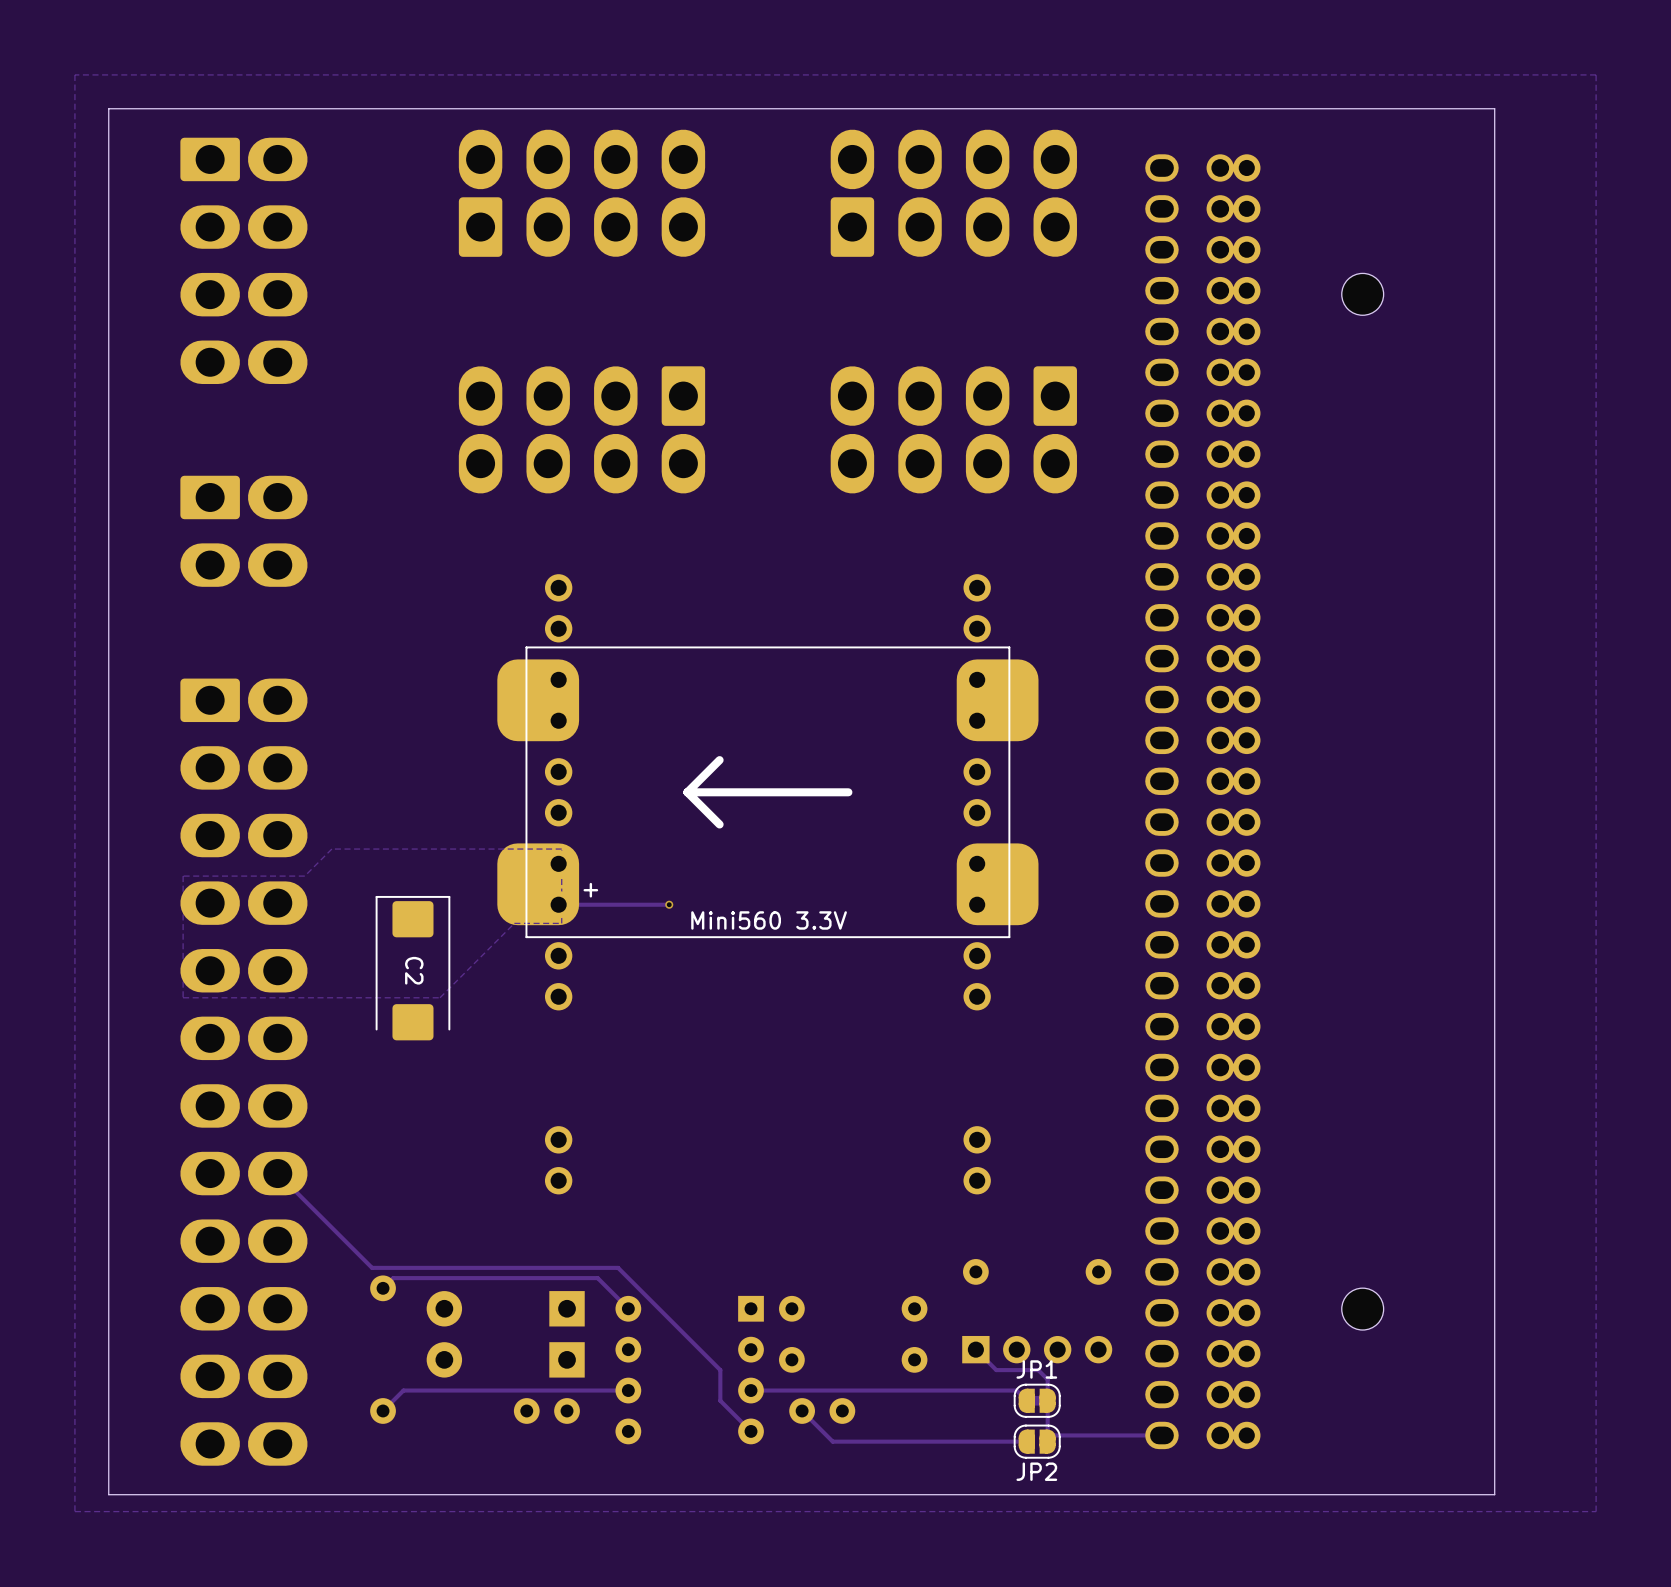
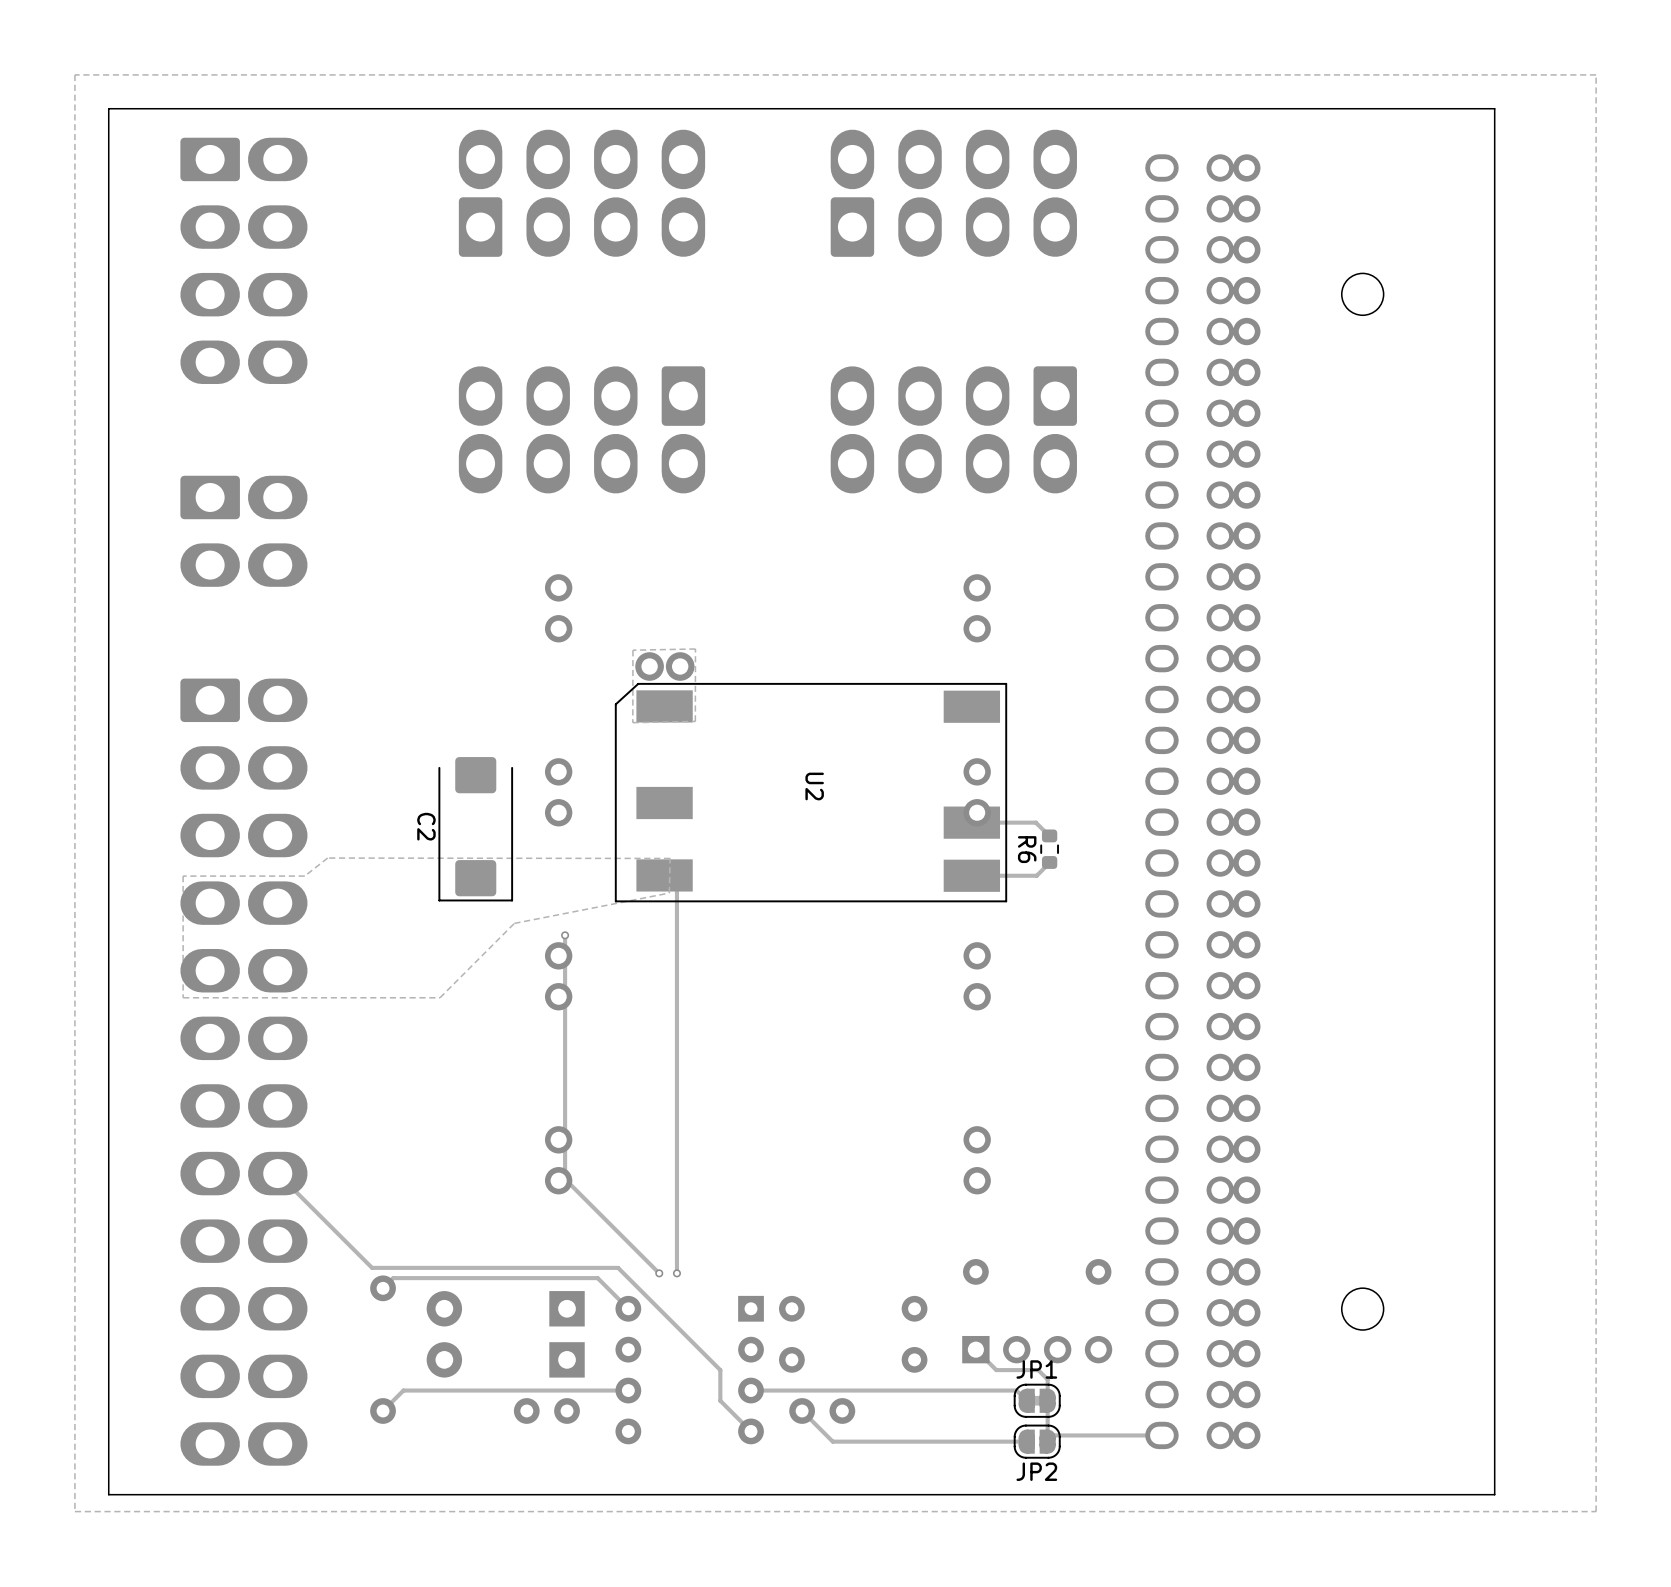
zone outline: none -> (695, 648) (695, 721) (632, 722) (632, 650) (695, 648)
via: none -> (649, 666)
via: none -> (680, 666)
part: Mini560 3.3V (767, 792) -> none
U2: none -> (811, 792)
track: none -> (971, 822) (1035, 822) (1049, 836)
R6: none -> (1049, 849)
track: none -> (1049, 862) (1036, 875) (971, 875)
track: none -> (664, 875) (676, 887) (676, 1273)
zone outline: (304, 876) (331, 849) (561, 849) (561, 923) (514, 923) -> (304, 876) (327, 858) (670, 858) (669, 893) (514, 923)
track: (669, 904) (558, 904) -> none
via: (669, 904) -> none
track: none -> (565, 935) (565, 1179) (659, 1273)
via: none -> (565, 935)
C2 rotation: 0° (412, 968) -> 180° (475, 829)
C2 position: (412, 968) -> (475, 829)
C2 name position: C2 (414, 970) -> C2 (426, 826)
via: none -> (659, 1273)
via: none -> (676, 1273)

